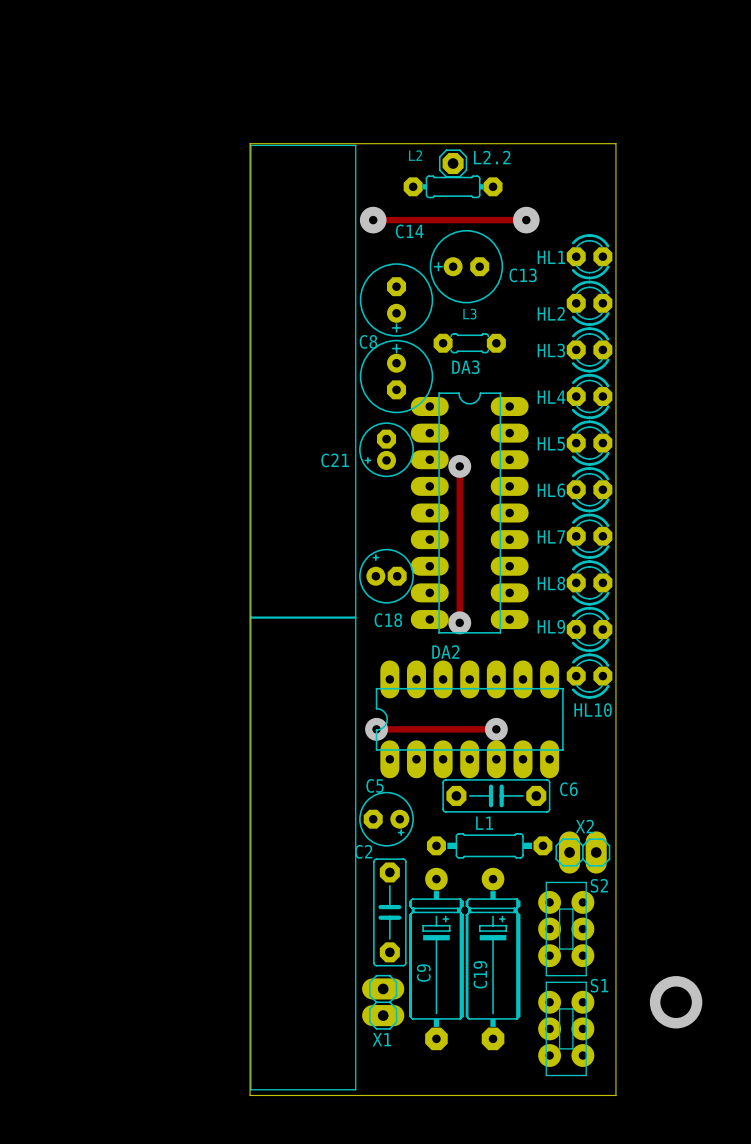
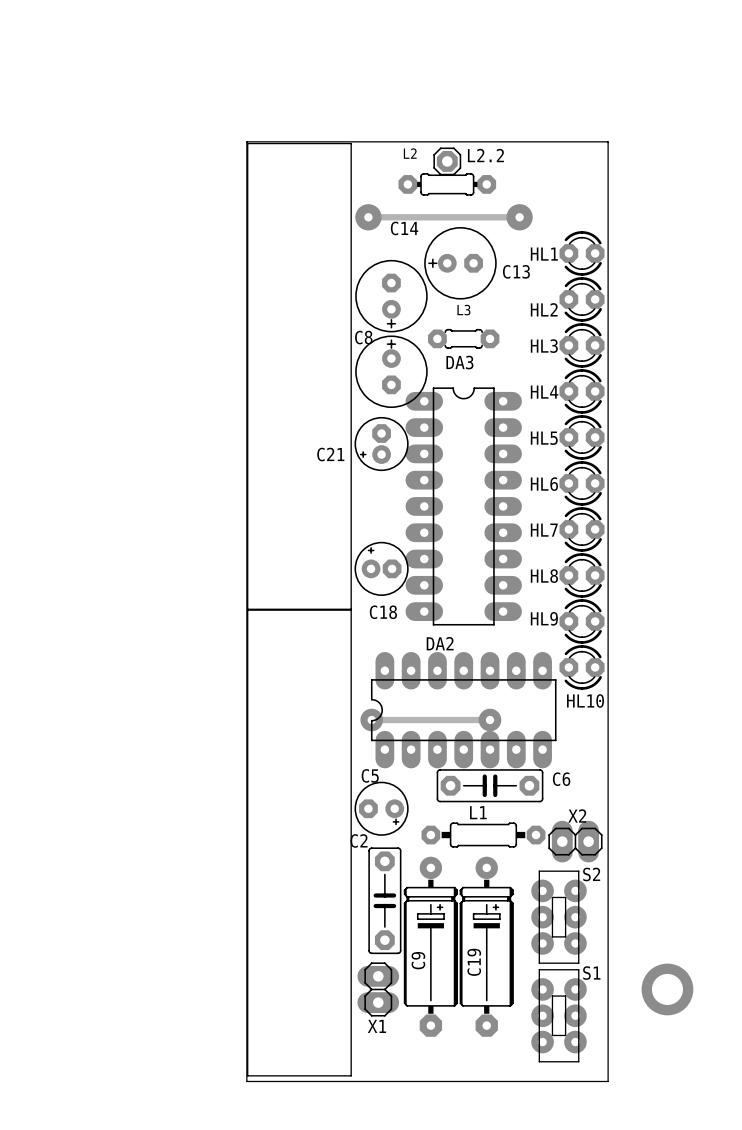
track: (459, 466) (459, 622) -> none
via: (459, 466) -> none
via: (459, 622) -> none

